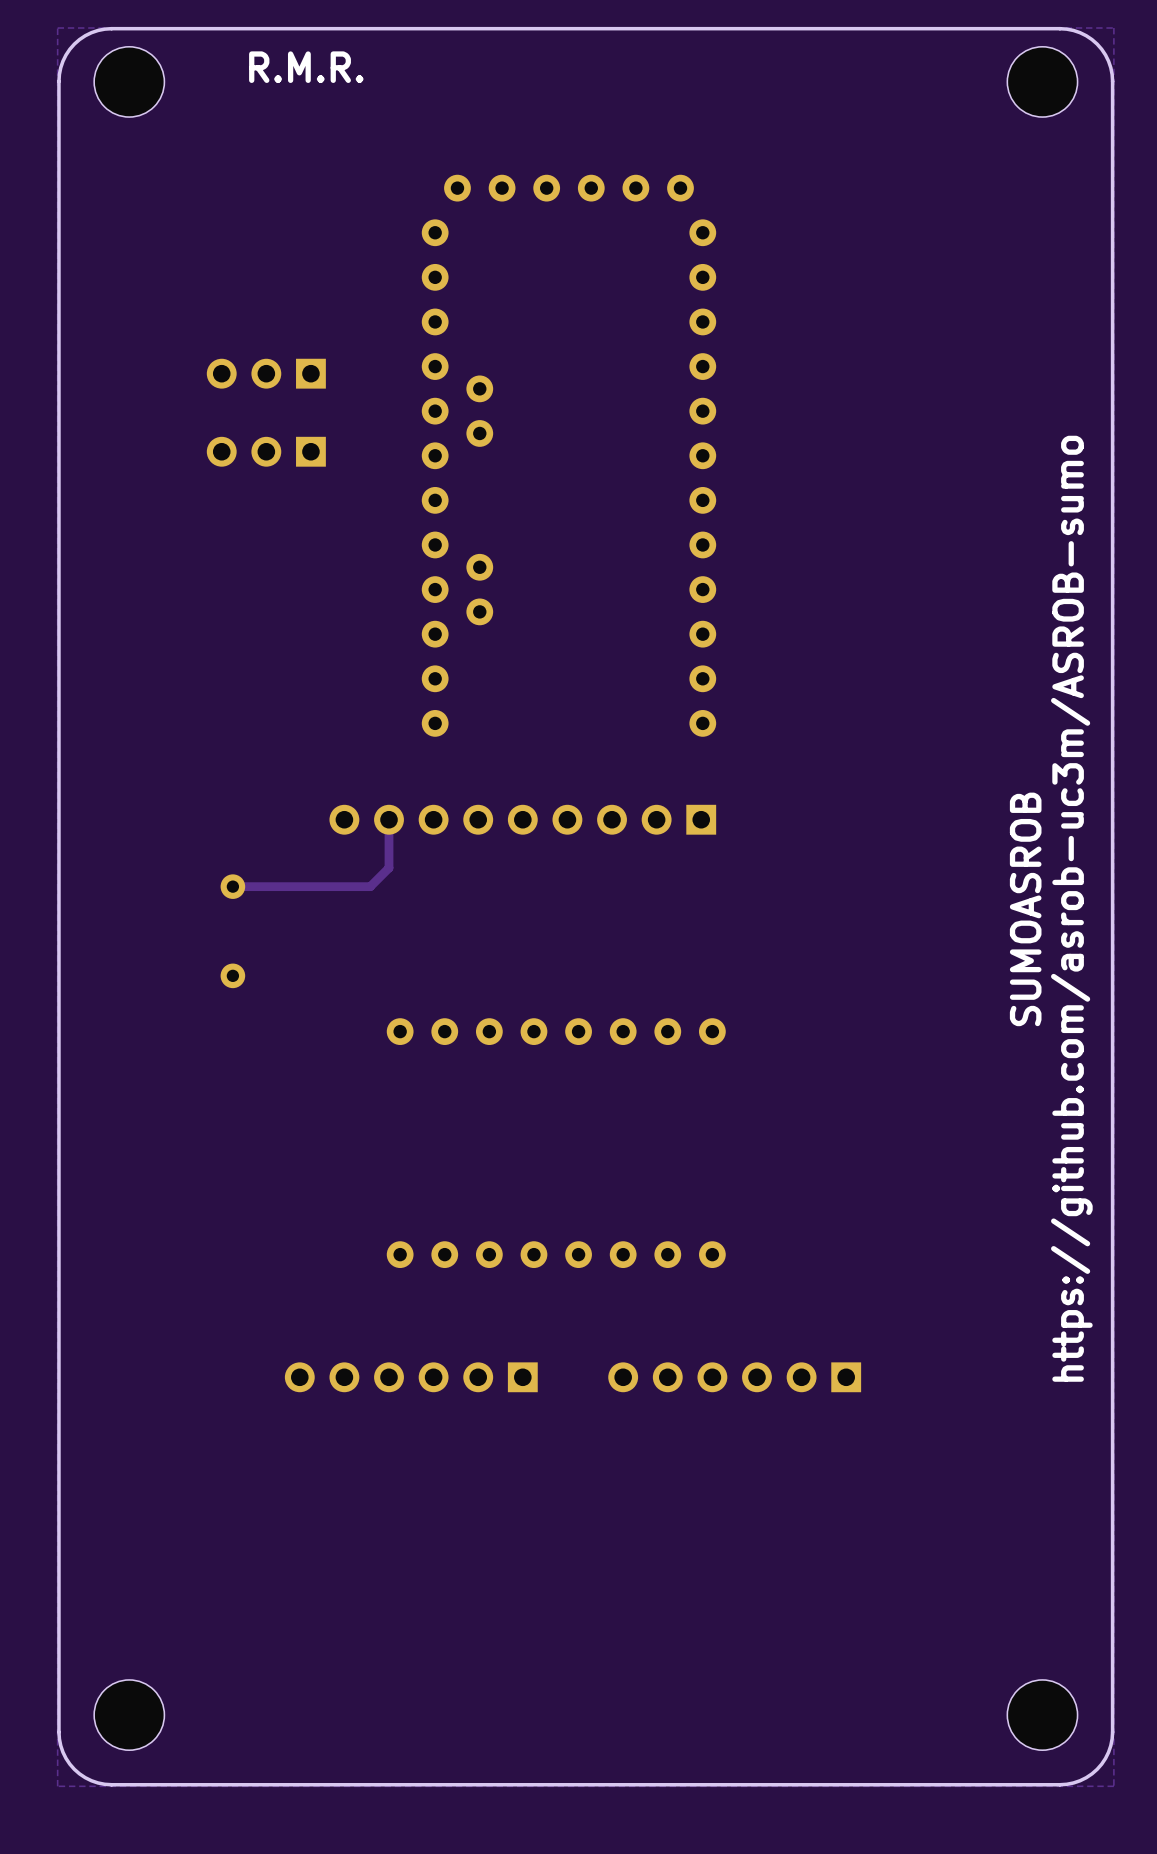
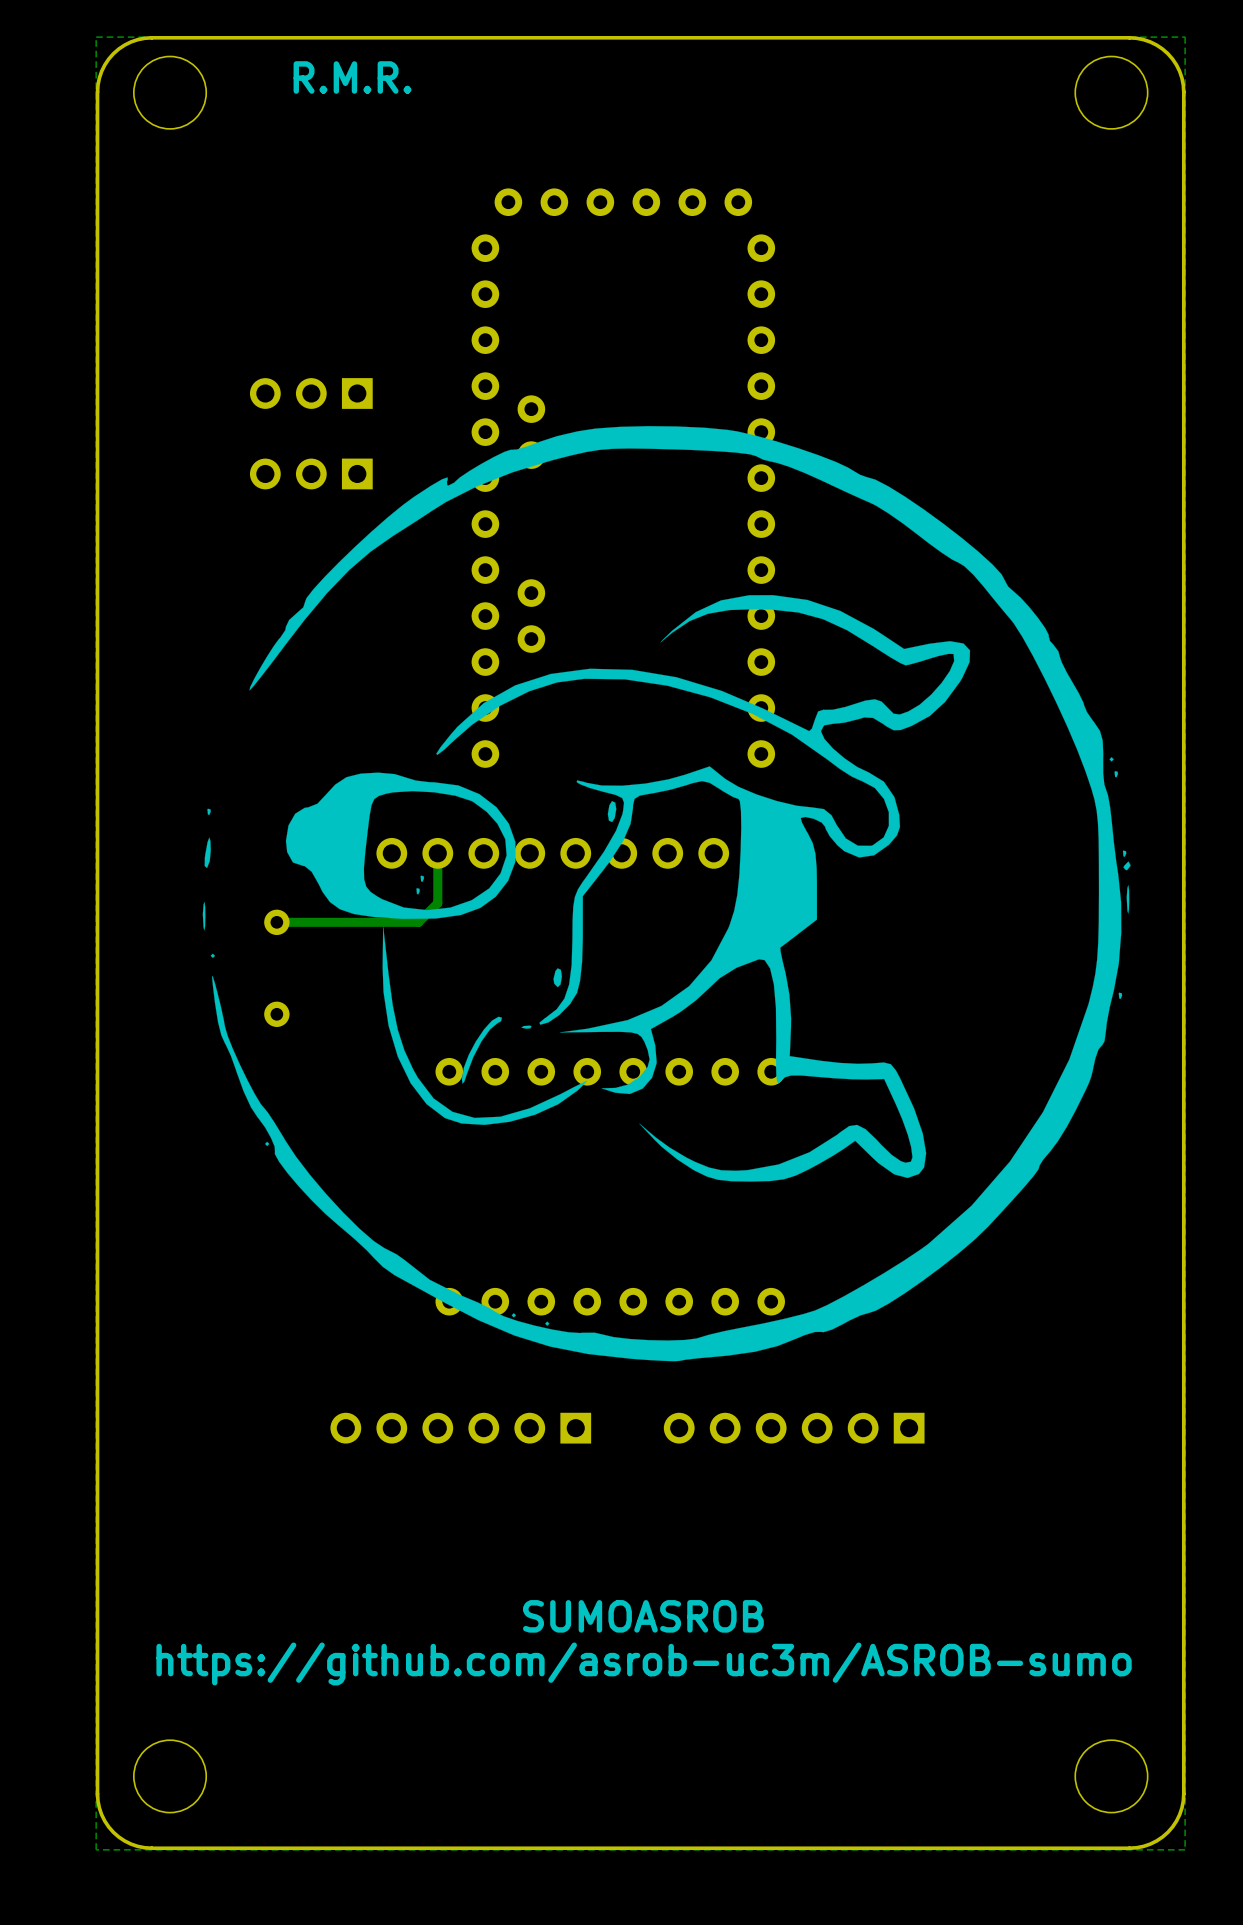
drawing: none -> [202, 426, 1131, 1362]
text: https://github.com/asrob-uc3m/ASROB-sumo (1071, 908) -> none
text: SUMOASROB (1025, 909) -> none
text: none -> SUMOASROB (643, 1616)
text: none -> https://github.com/asrob-uc3m/ASROB-sumo (644, 1663)

